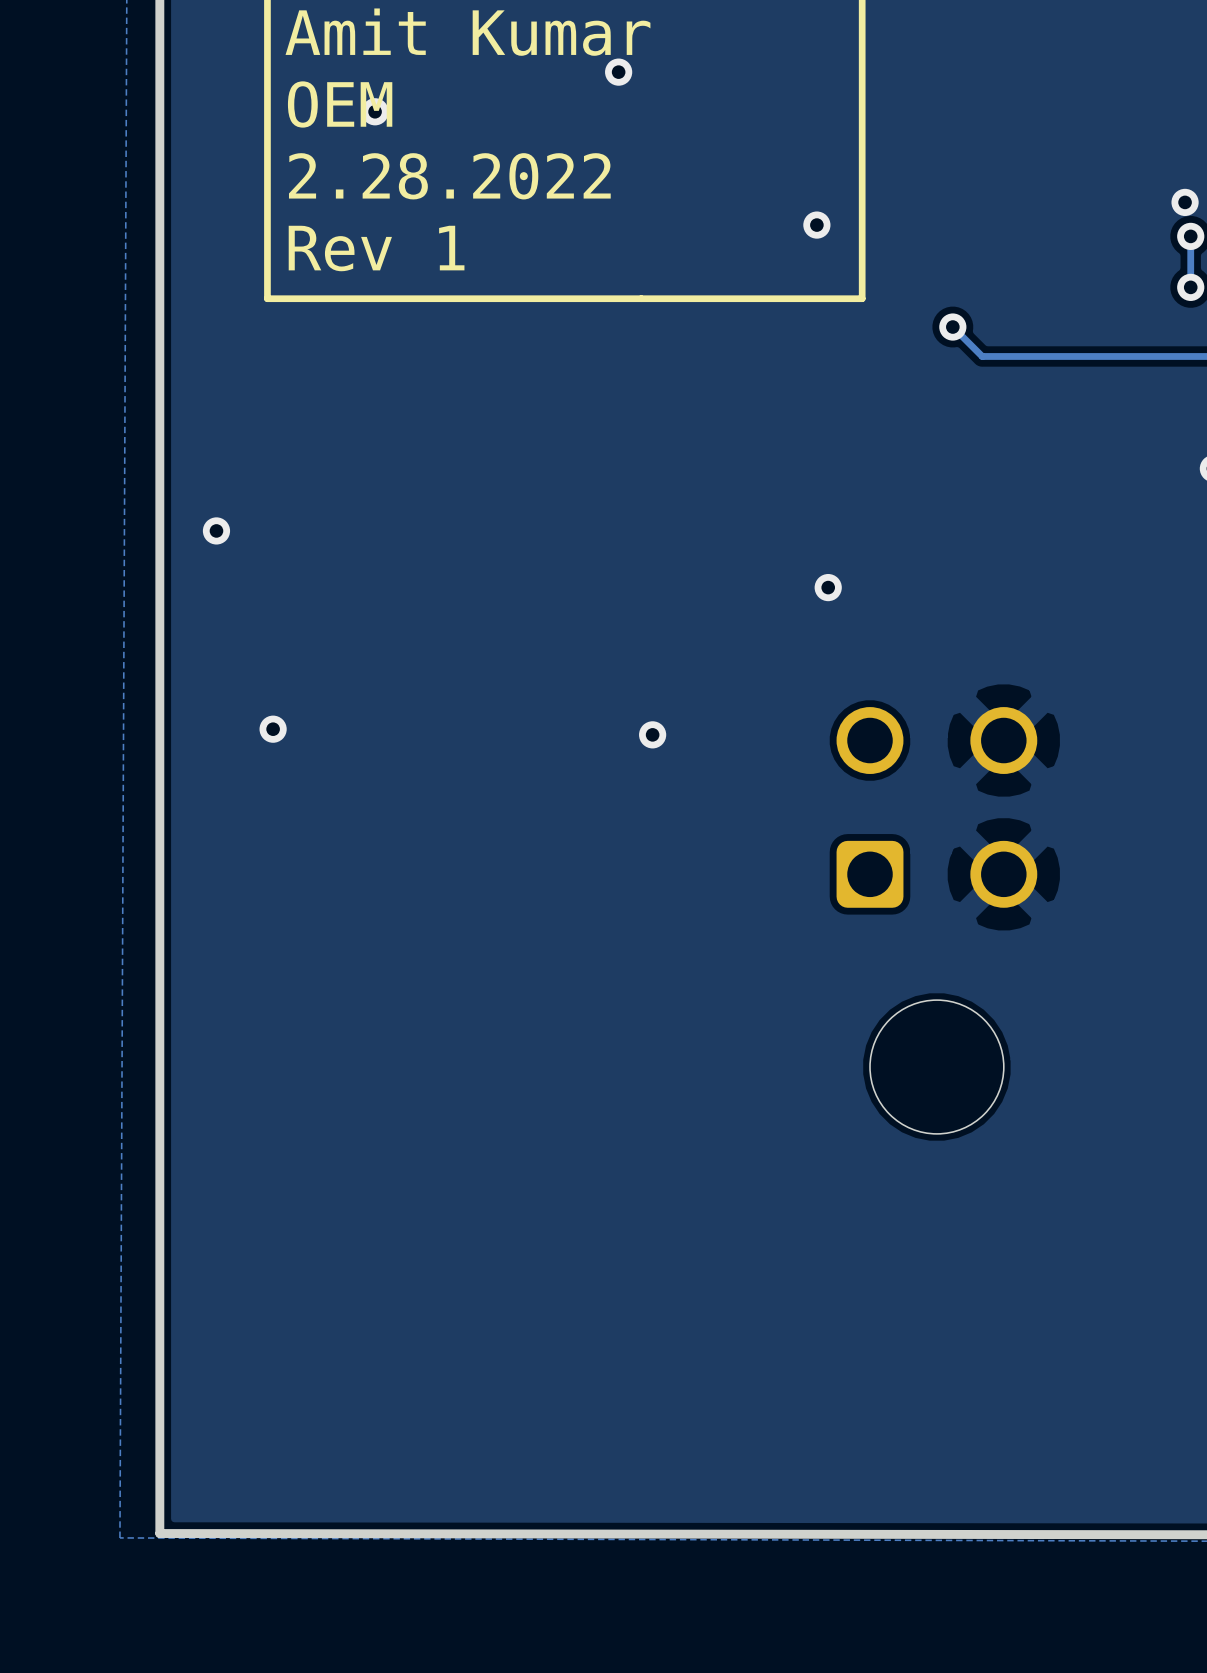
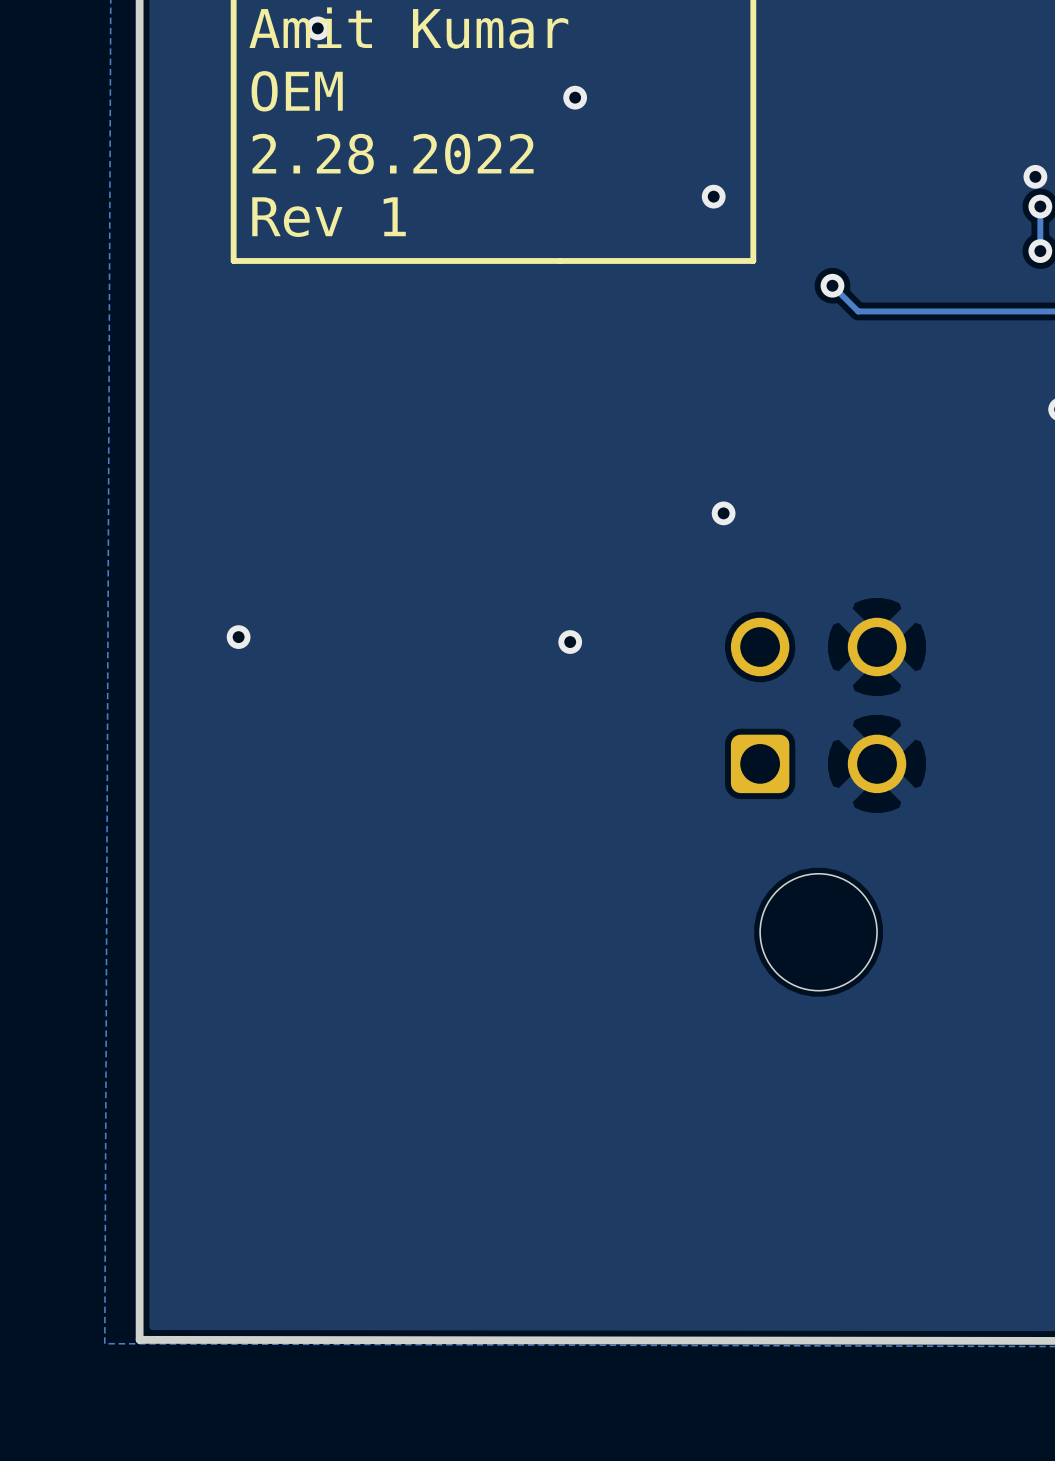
via position: (618, 72) -> (575, 97)
via position: (375, 111) -> (317, 28)
via: (216, 530) -> none

